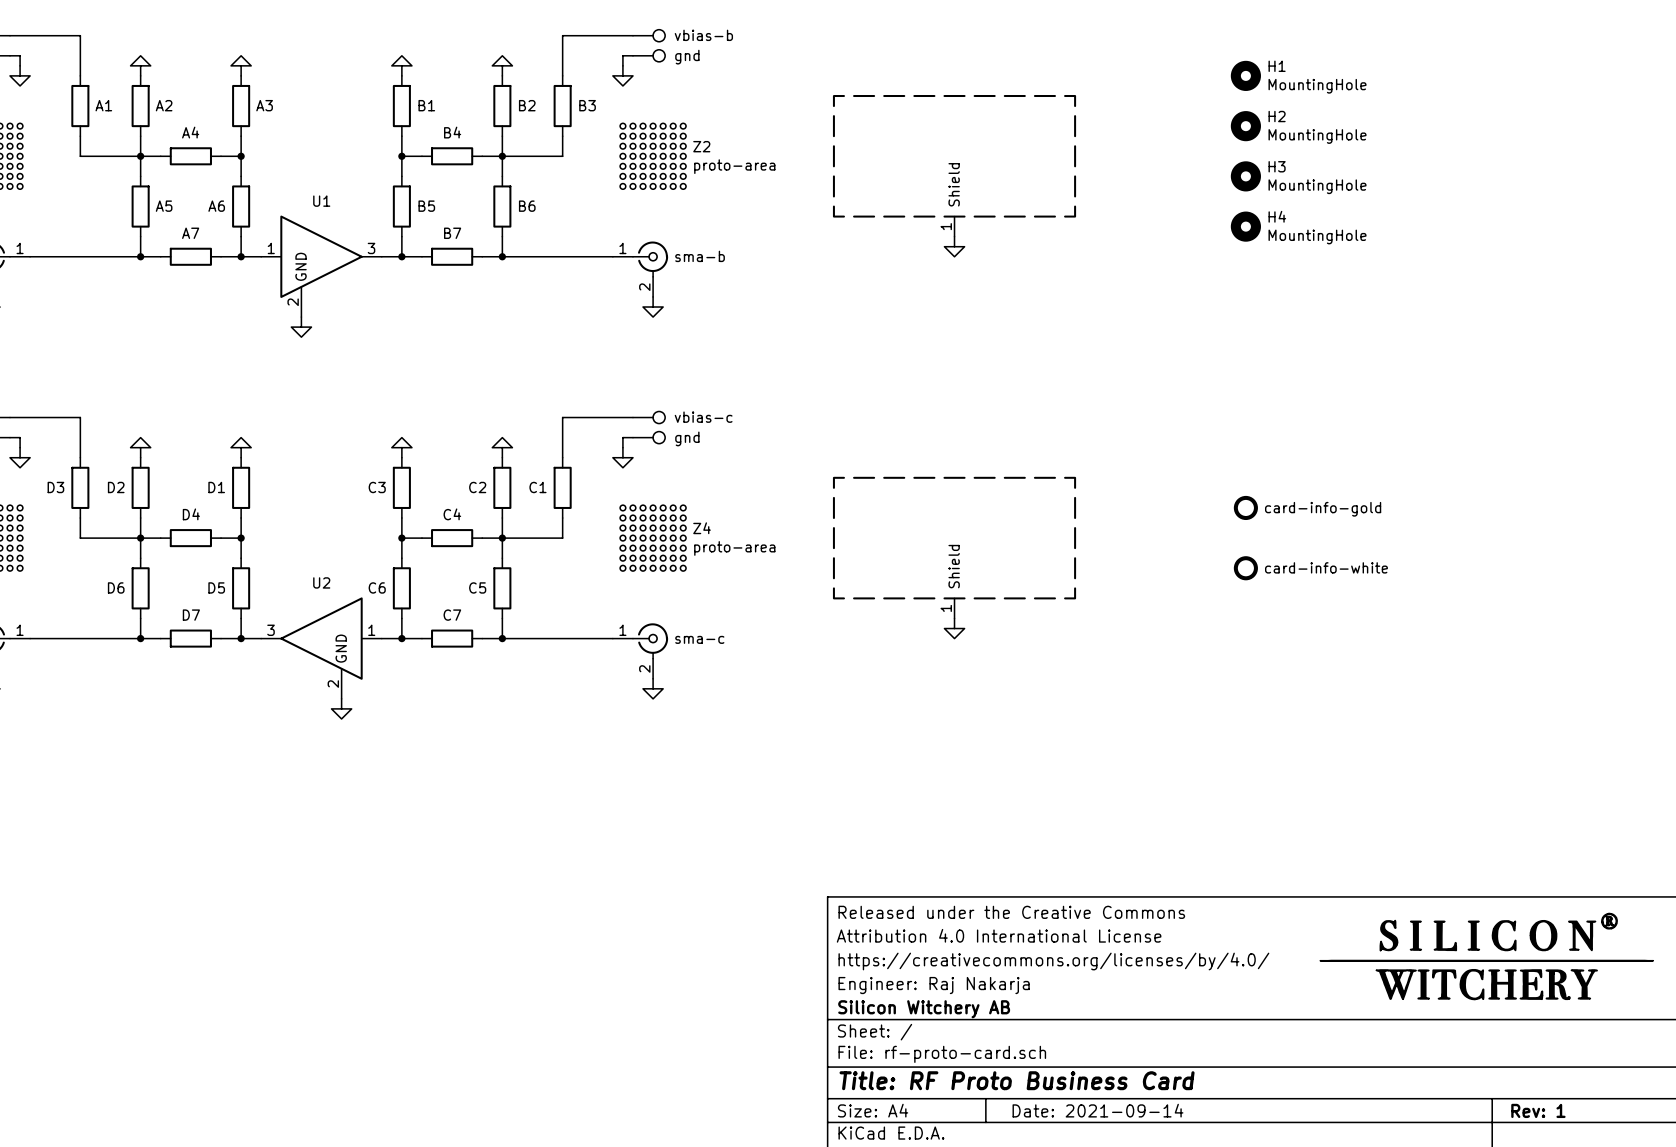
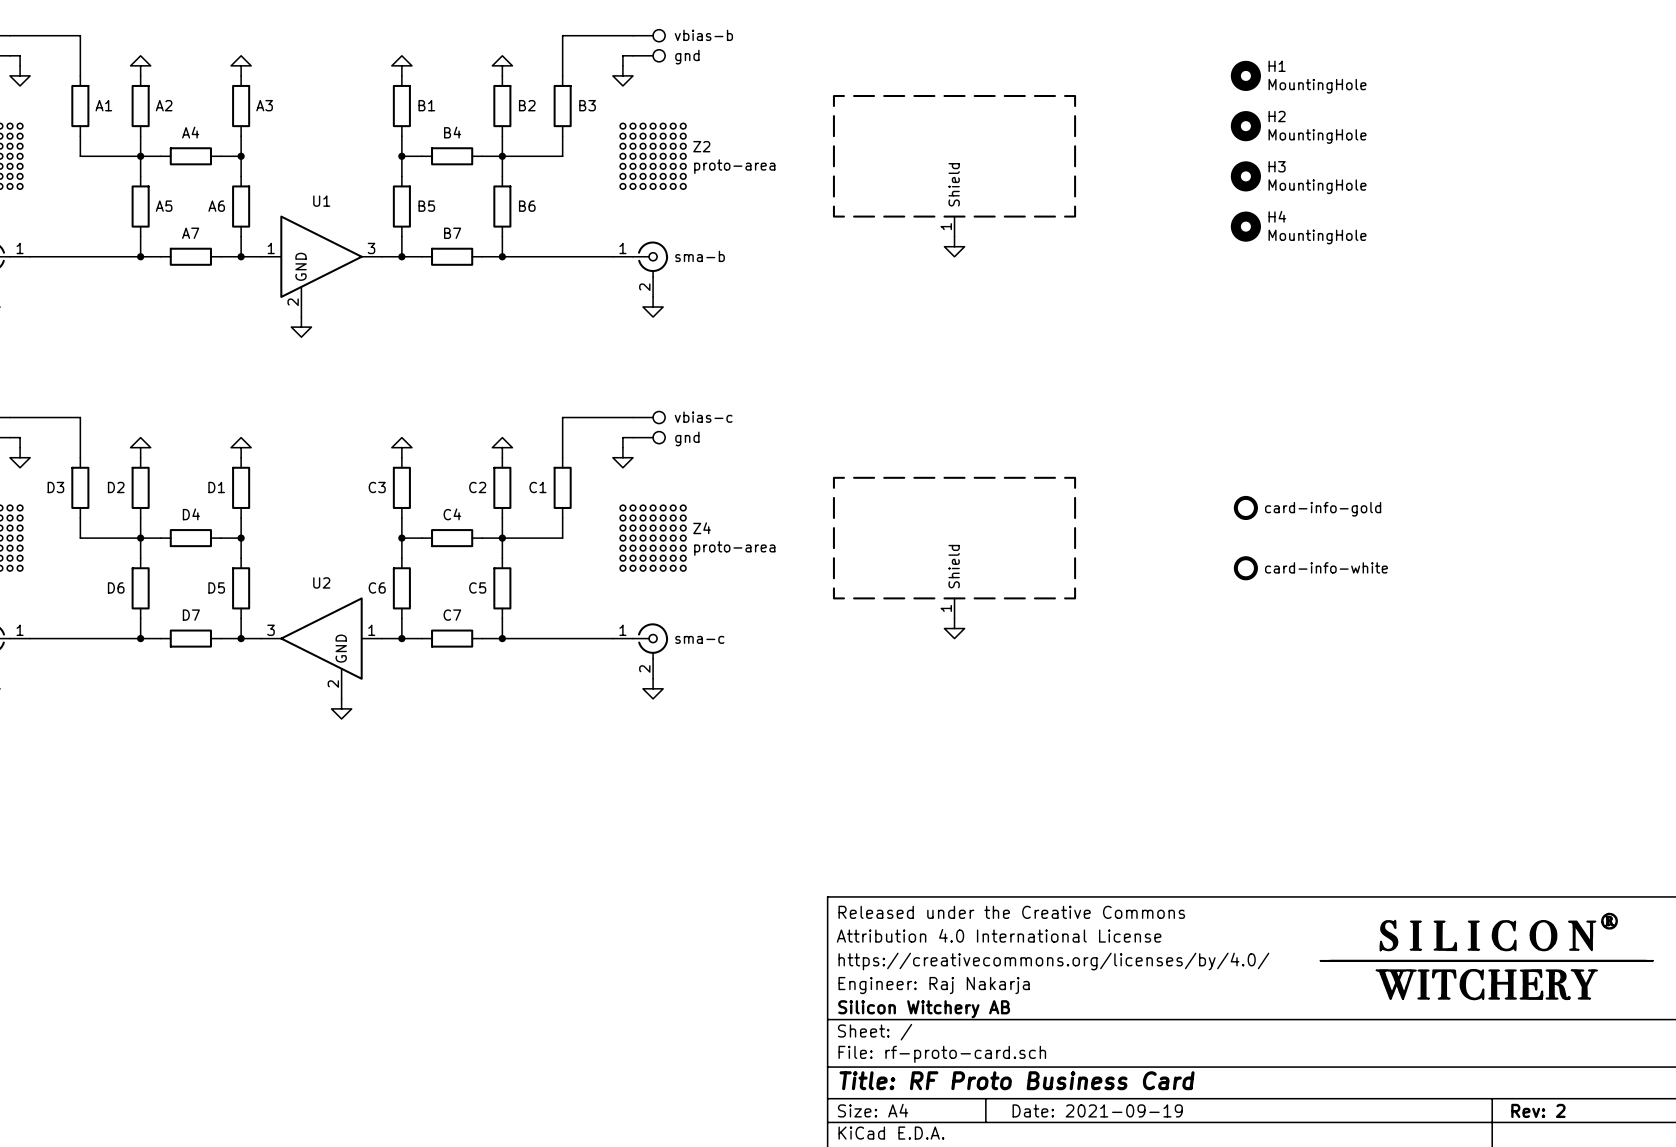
title block: Date: 2021-09-14 (1097, 1110) -> Date: 2021-09-19 (1097, 1110)
title block: Rev: 1 (1538, 1110) -> Rev: 2 (1538, 1110)

